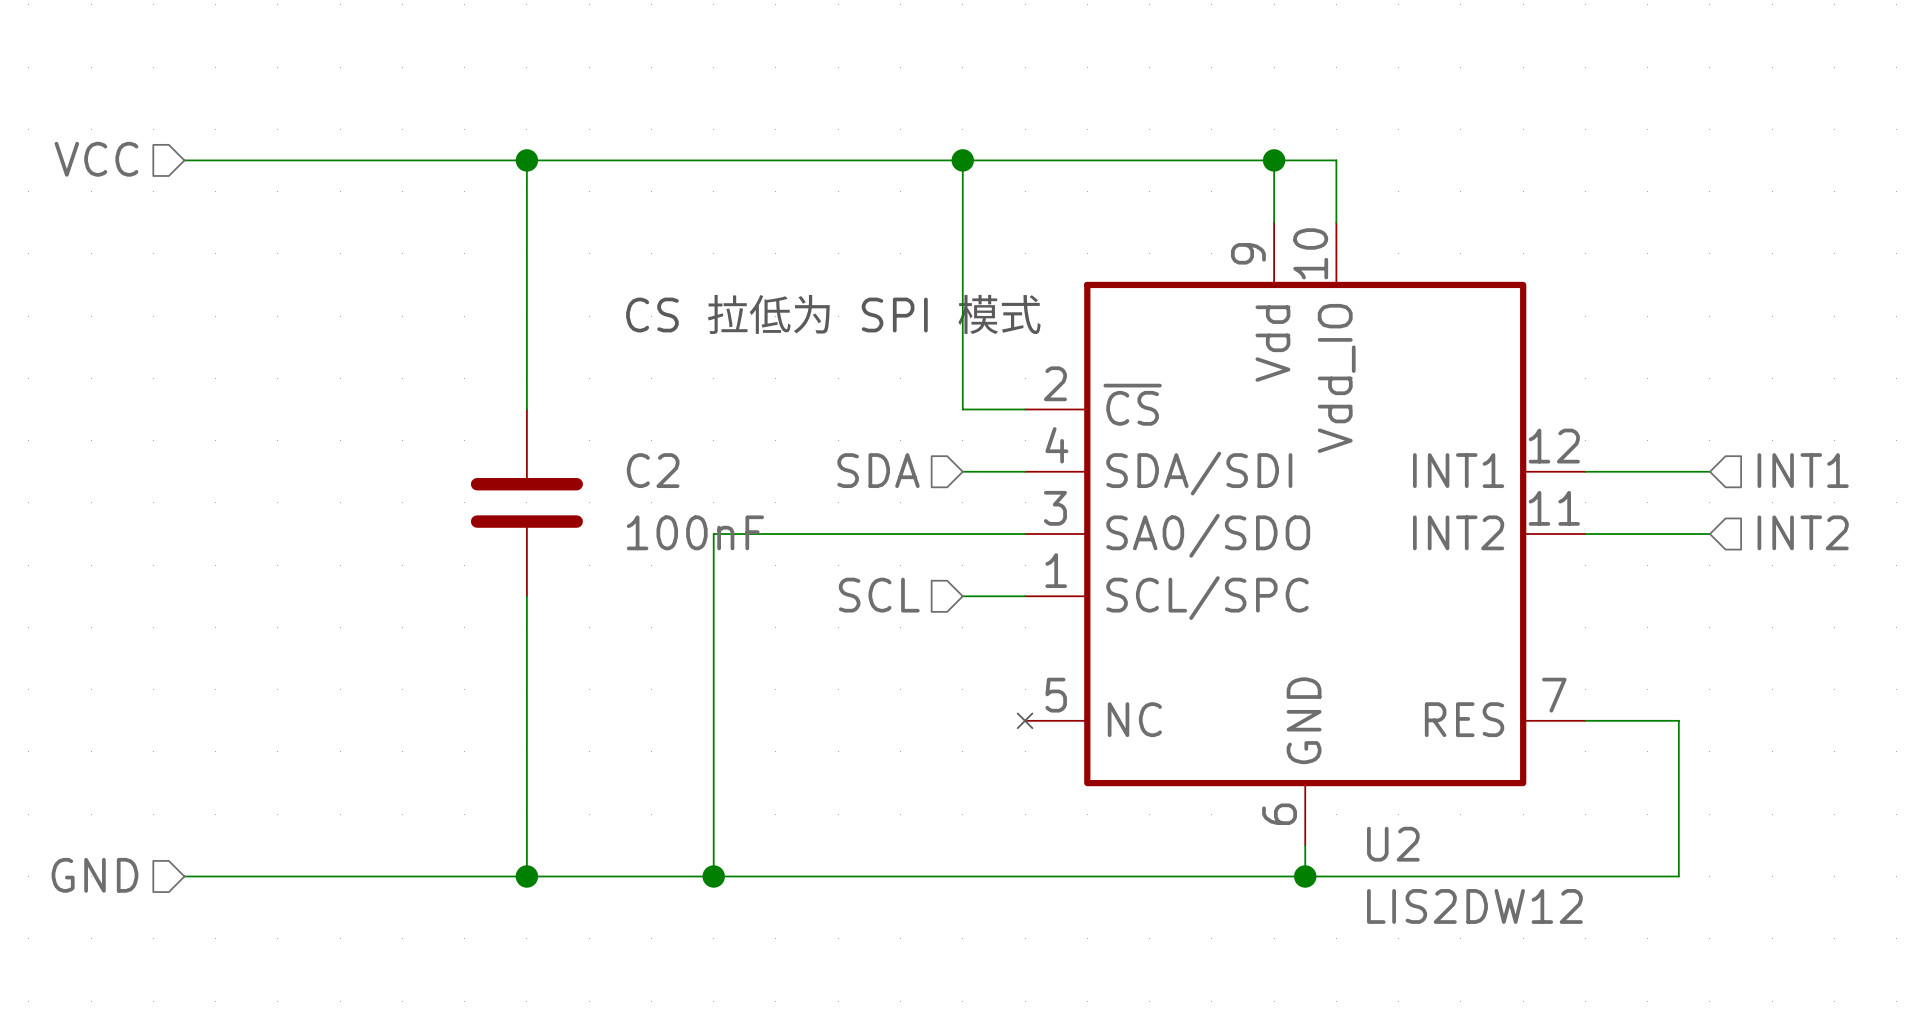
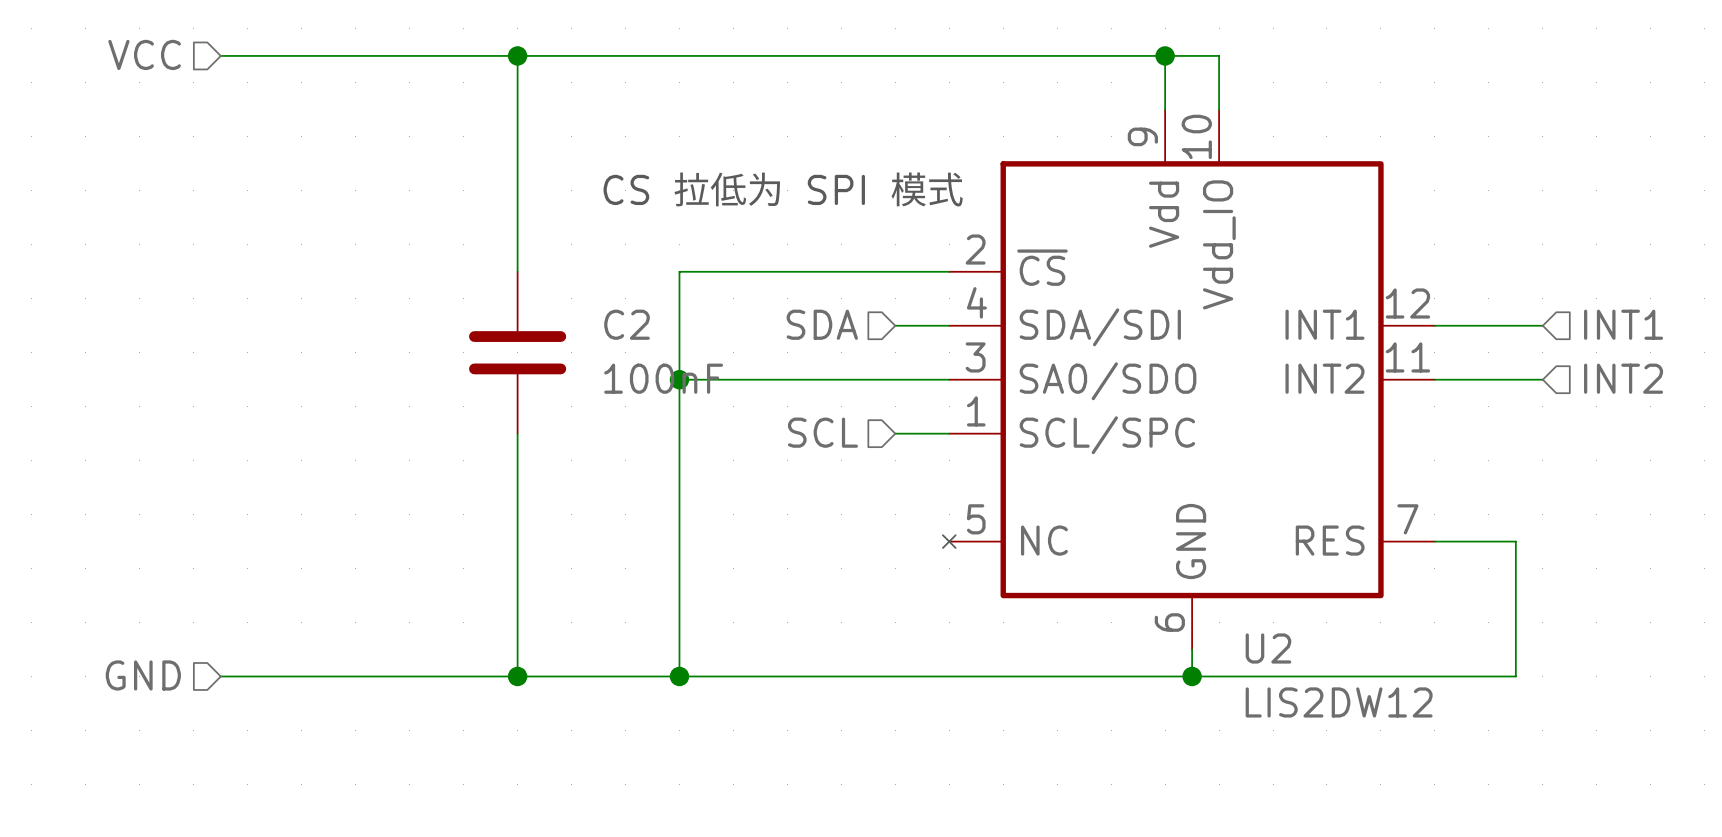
wire: (962, 160) (962, 409) -> (679, 379) (679, 271) (895, 271)
junction: (962, 160) -> none
junction: none -> (679, 379)

